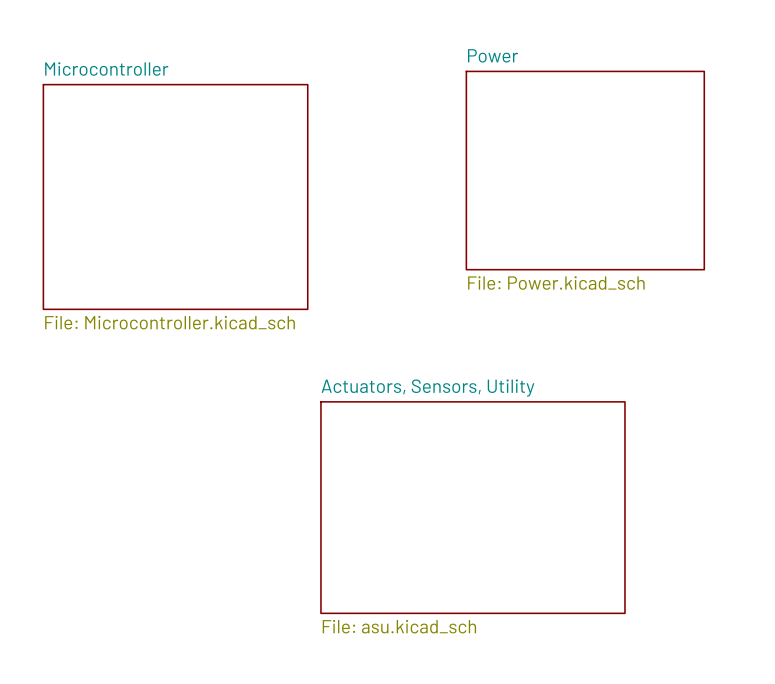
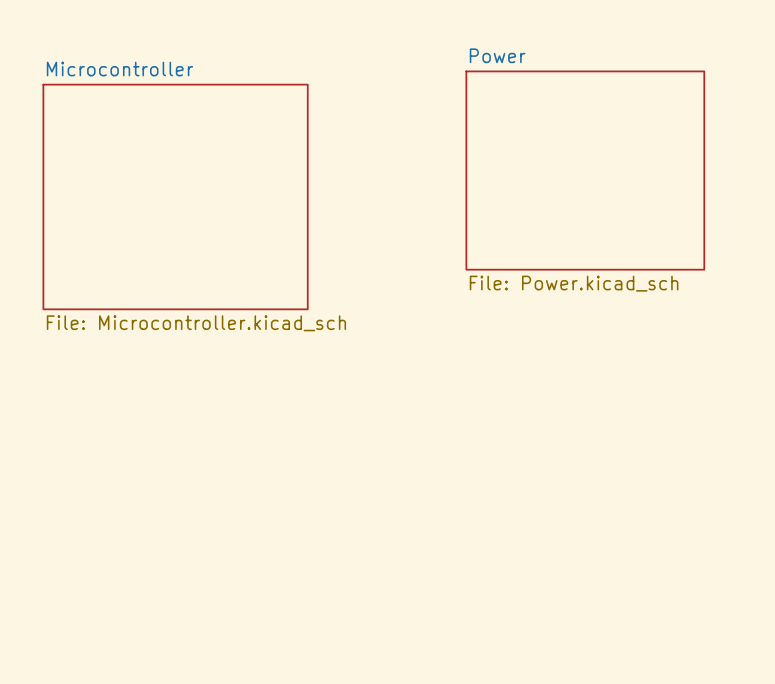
sheet Actuators, Sensors, Utility: File: asu.kicad_sch (472, 507) -> none

